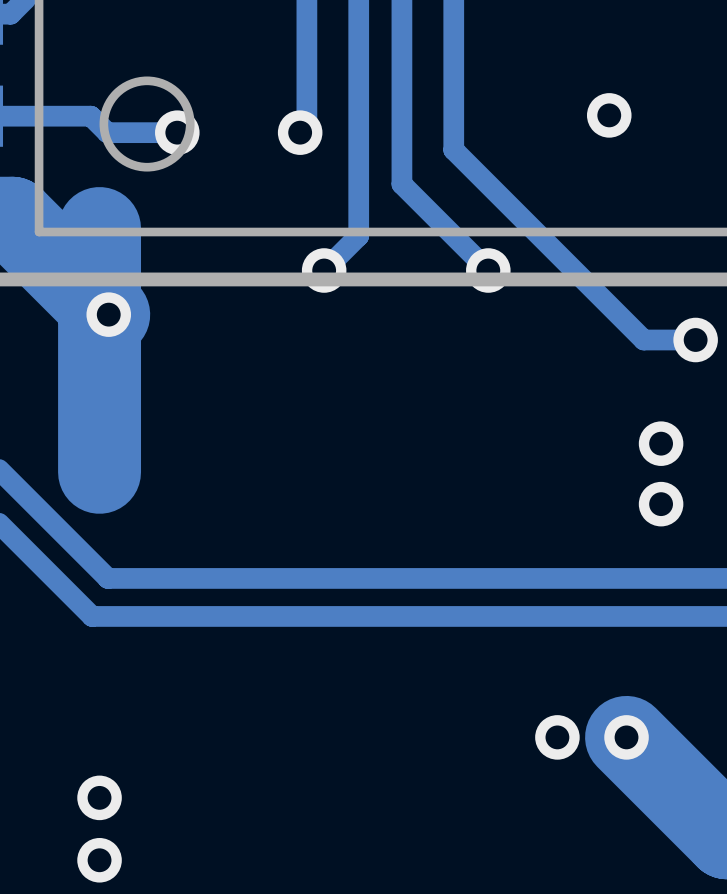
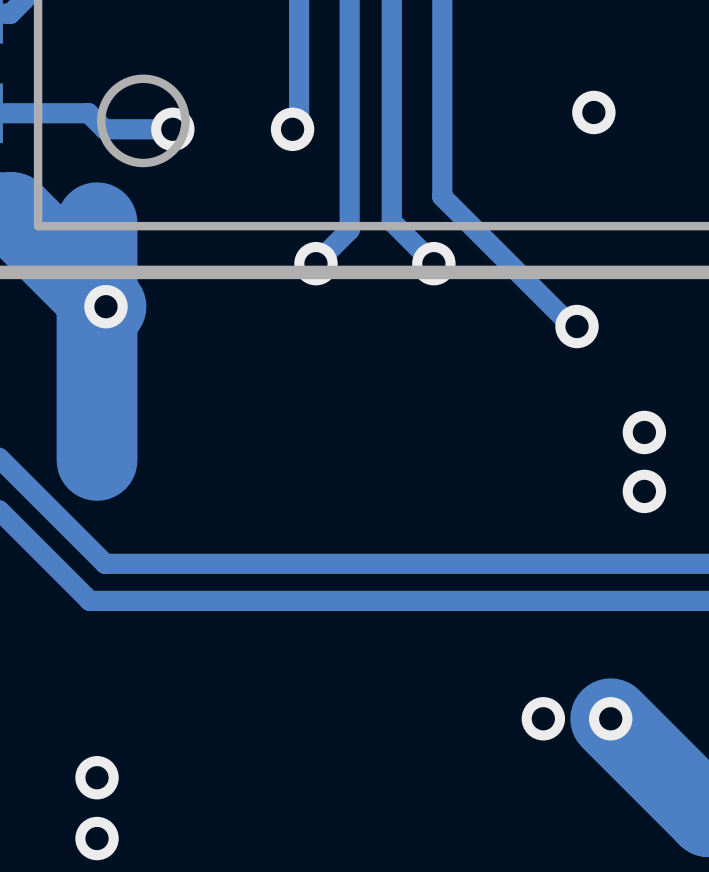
track: (453, 149) (643, 340) (695, 340) -> (442, 146) (442, 196) (572, 326) (577, 326)
track: (401, 184) (488, 270) -> (391, 179) (391, 221) (433, 263)
via position: (488, 270) -> (433, 263)
via: none -> (577, 326)
via: (695, 340) -> none

